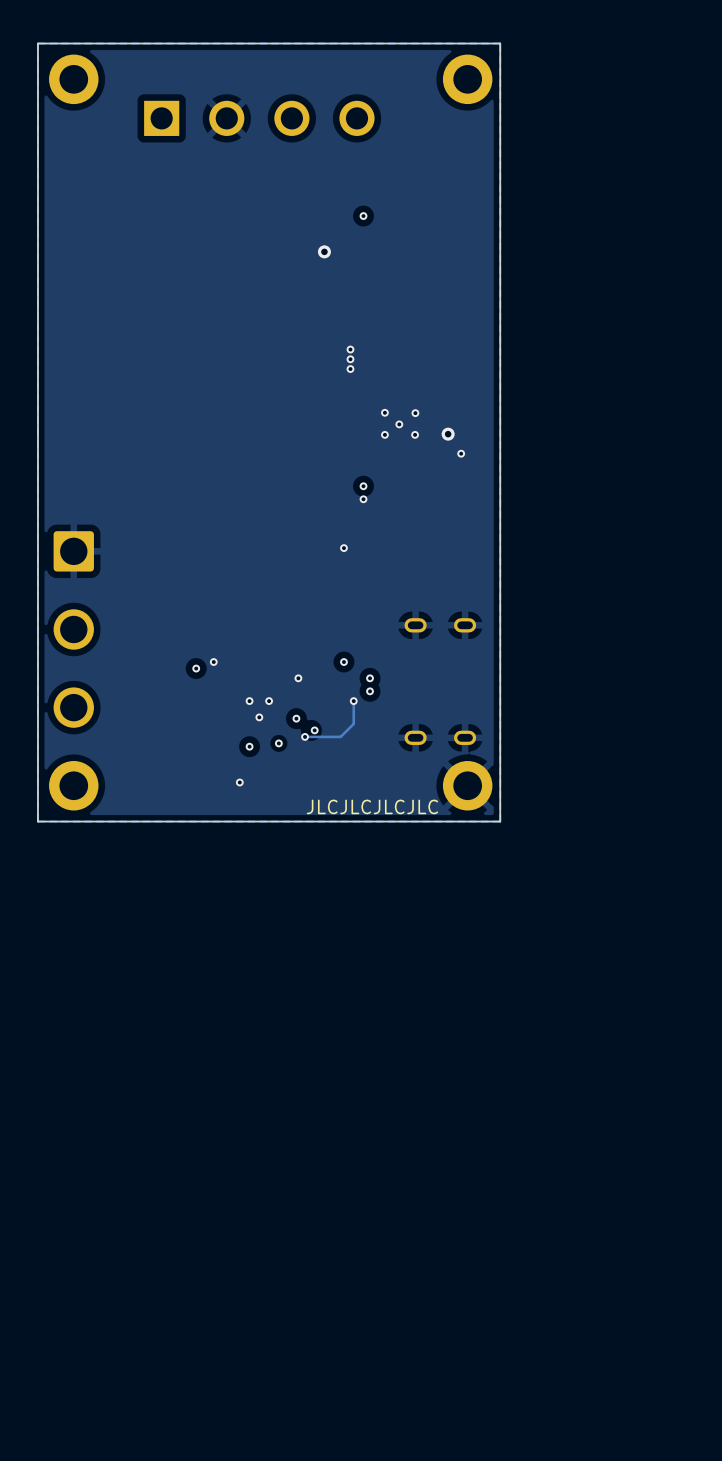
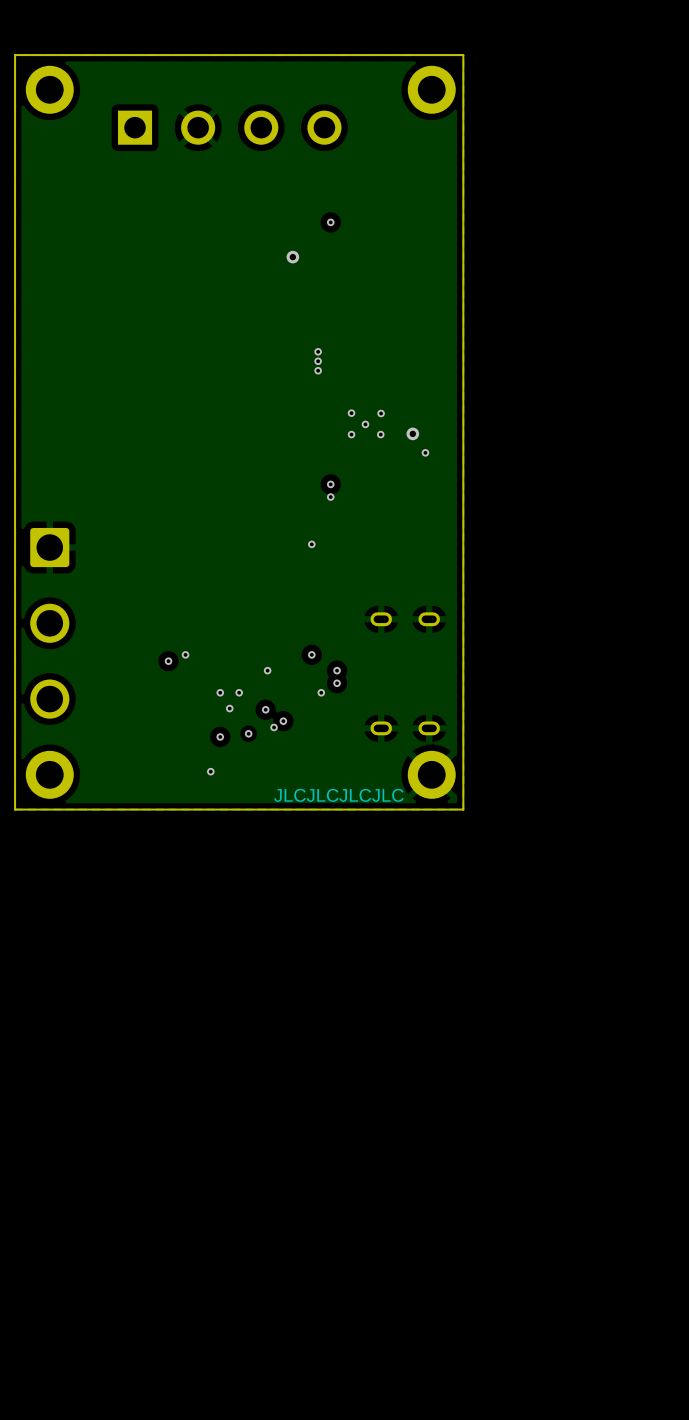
track: (353, 701) (353, 723) (340, 736) (305, 736) -> none

